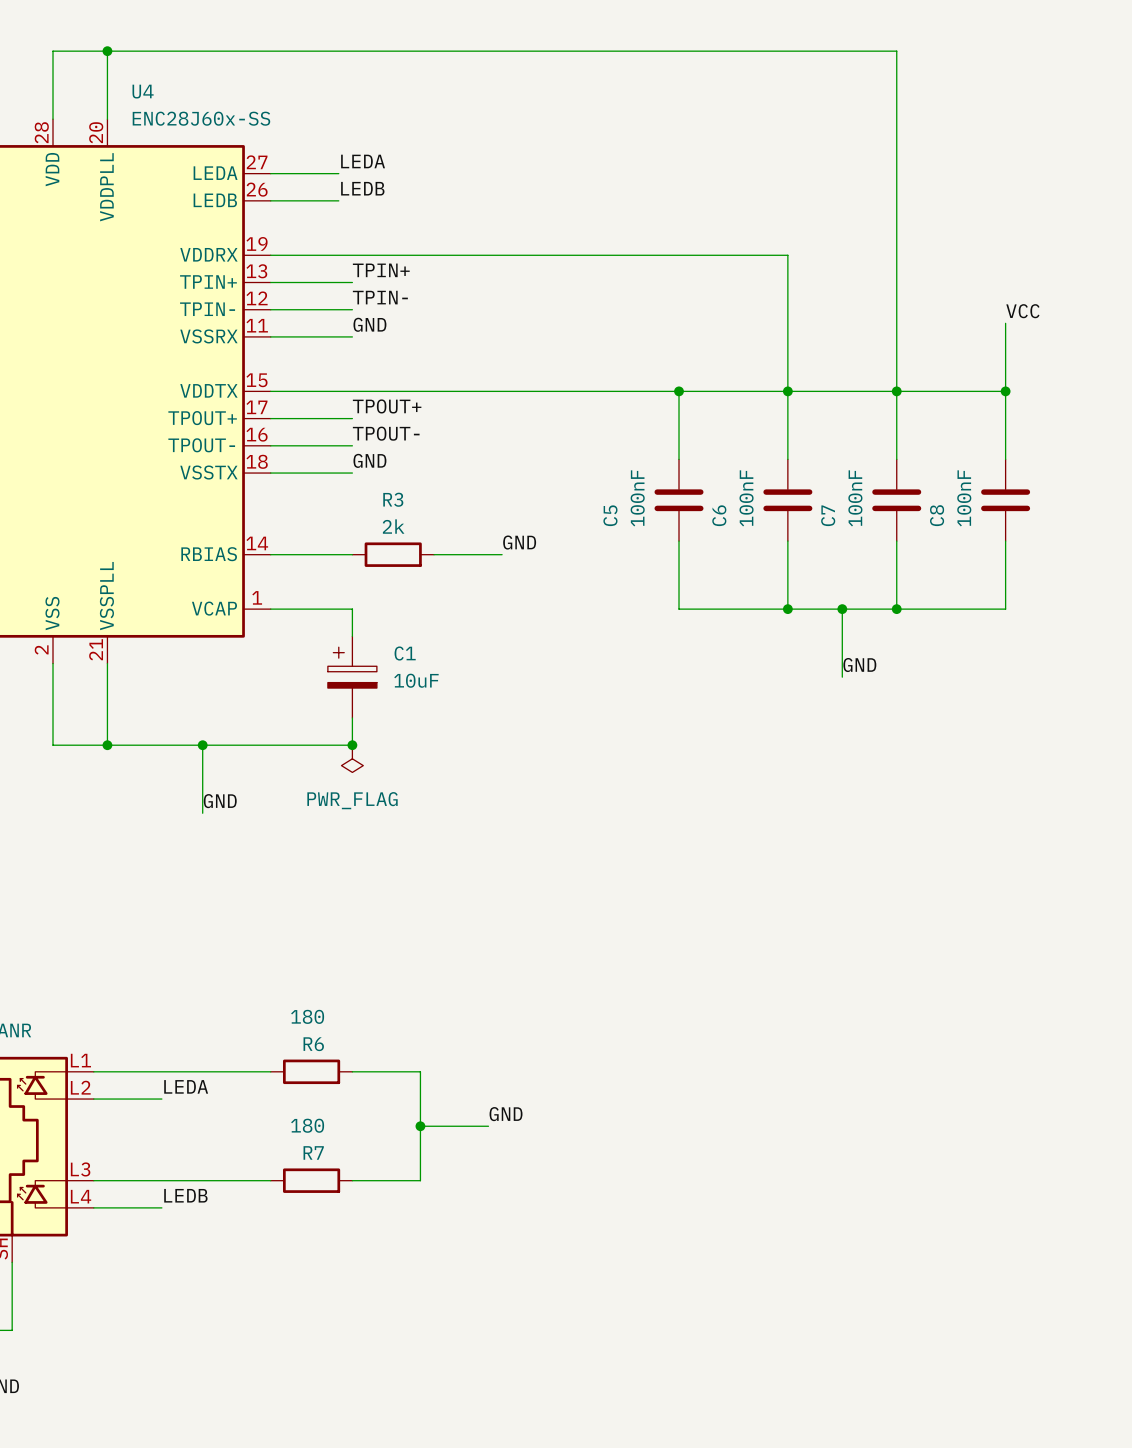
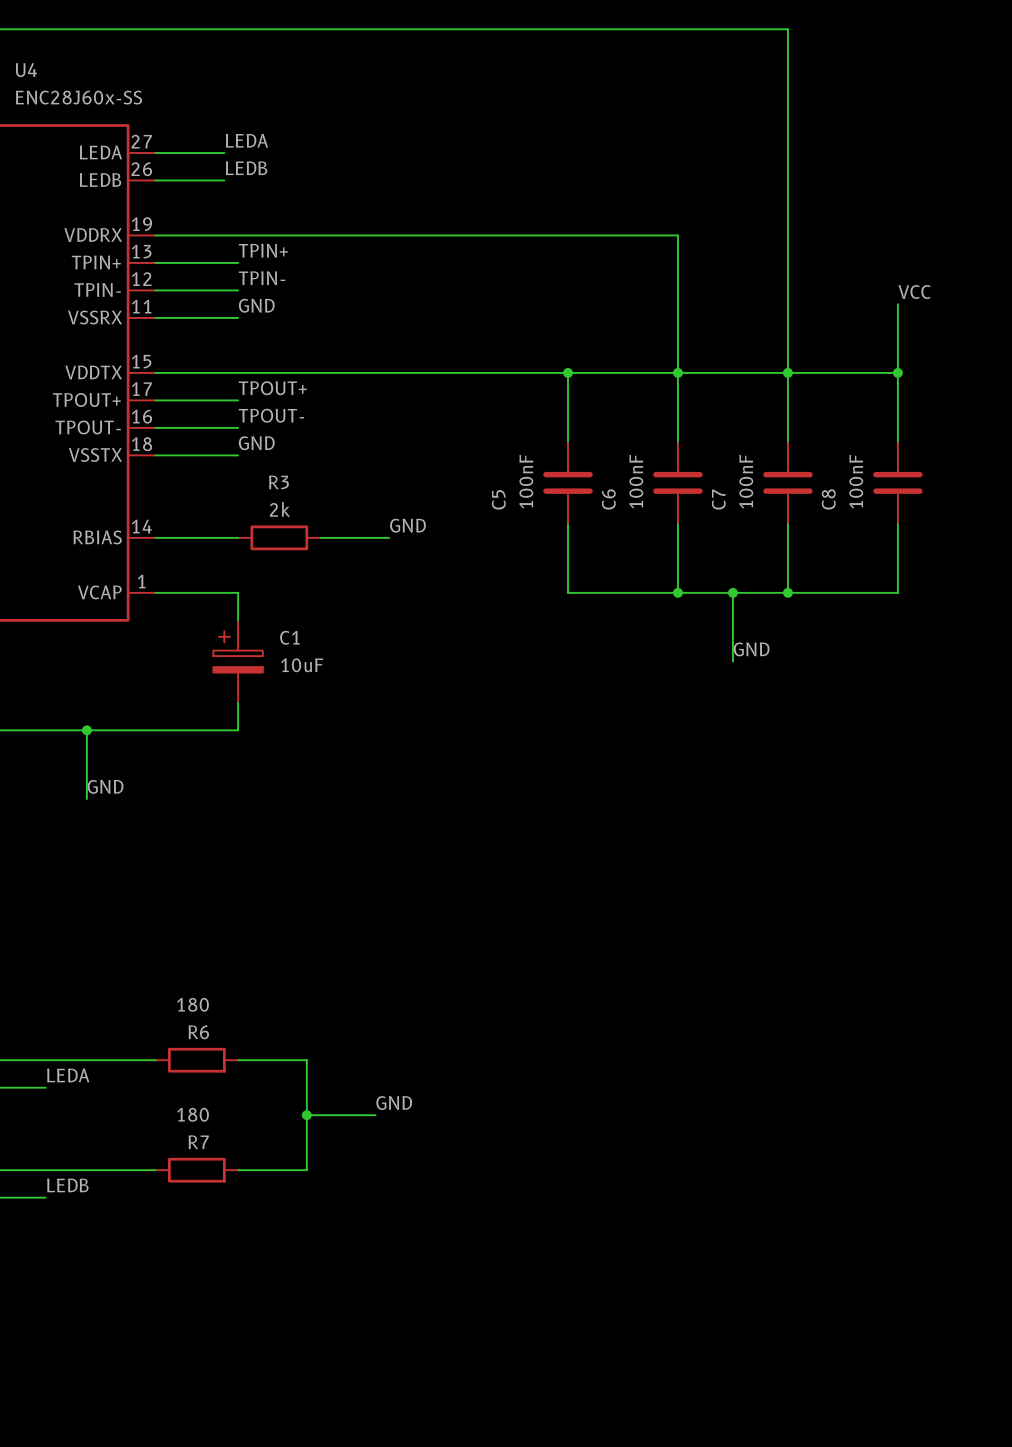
junction: (352, 745) -> none
power symbol: PWR_FLAG (352, 758) -> none

